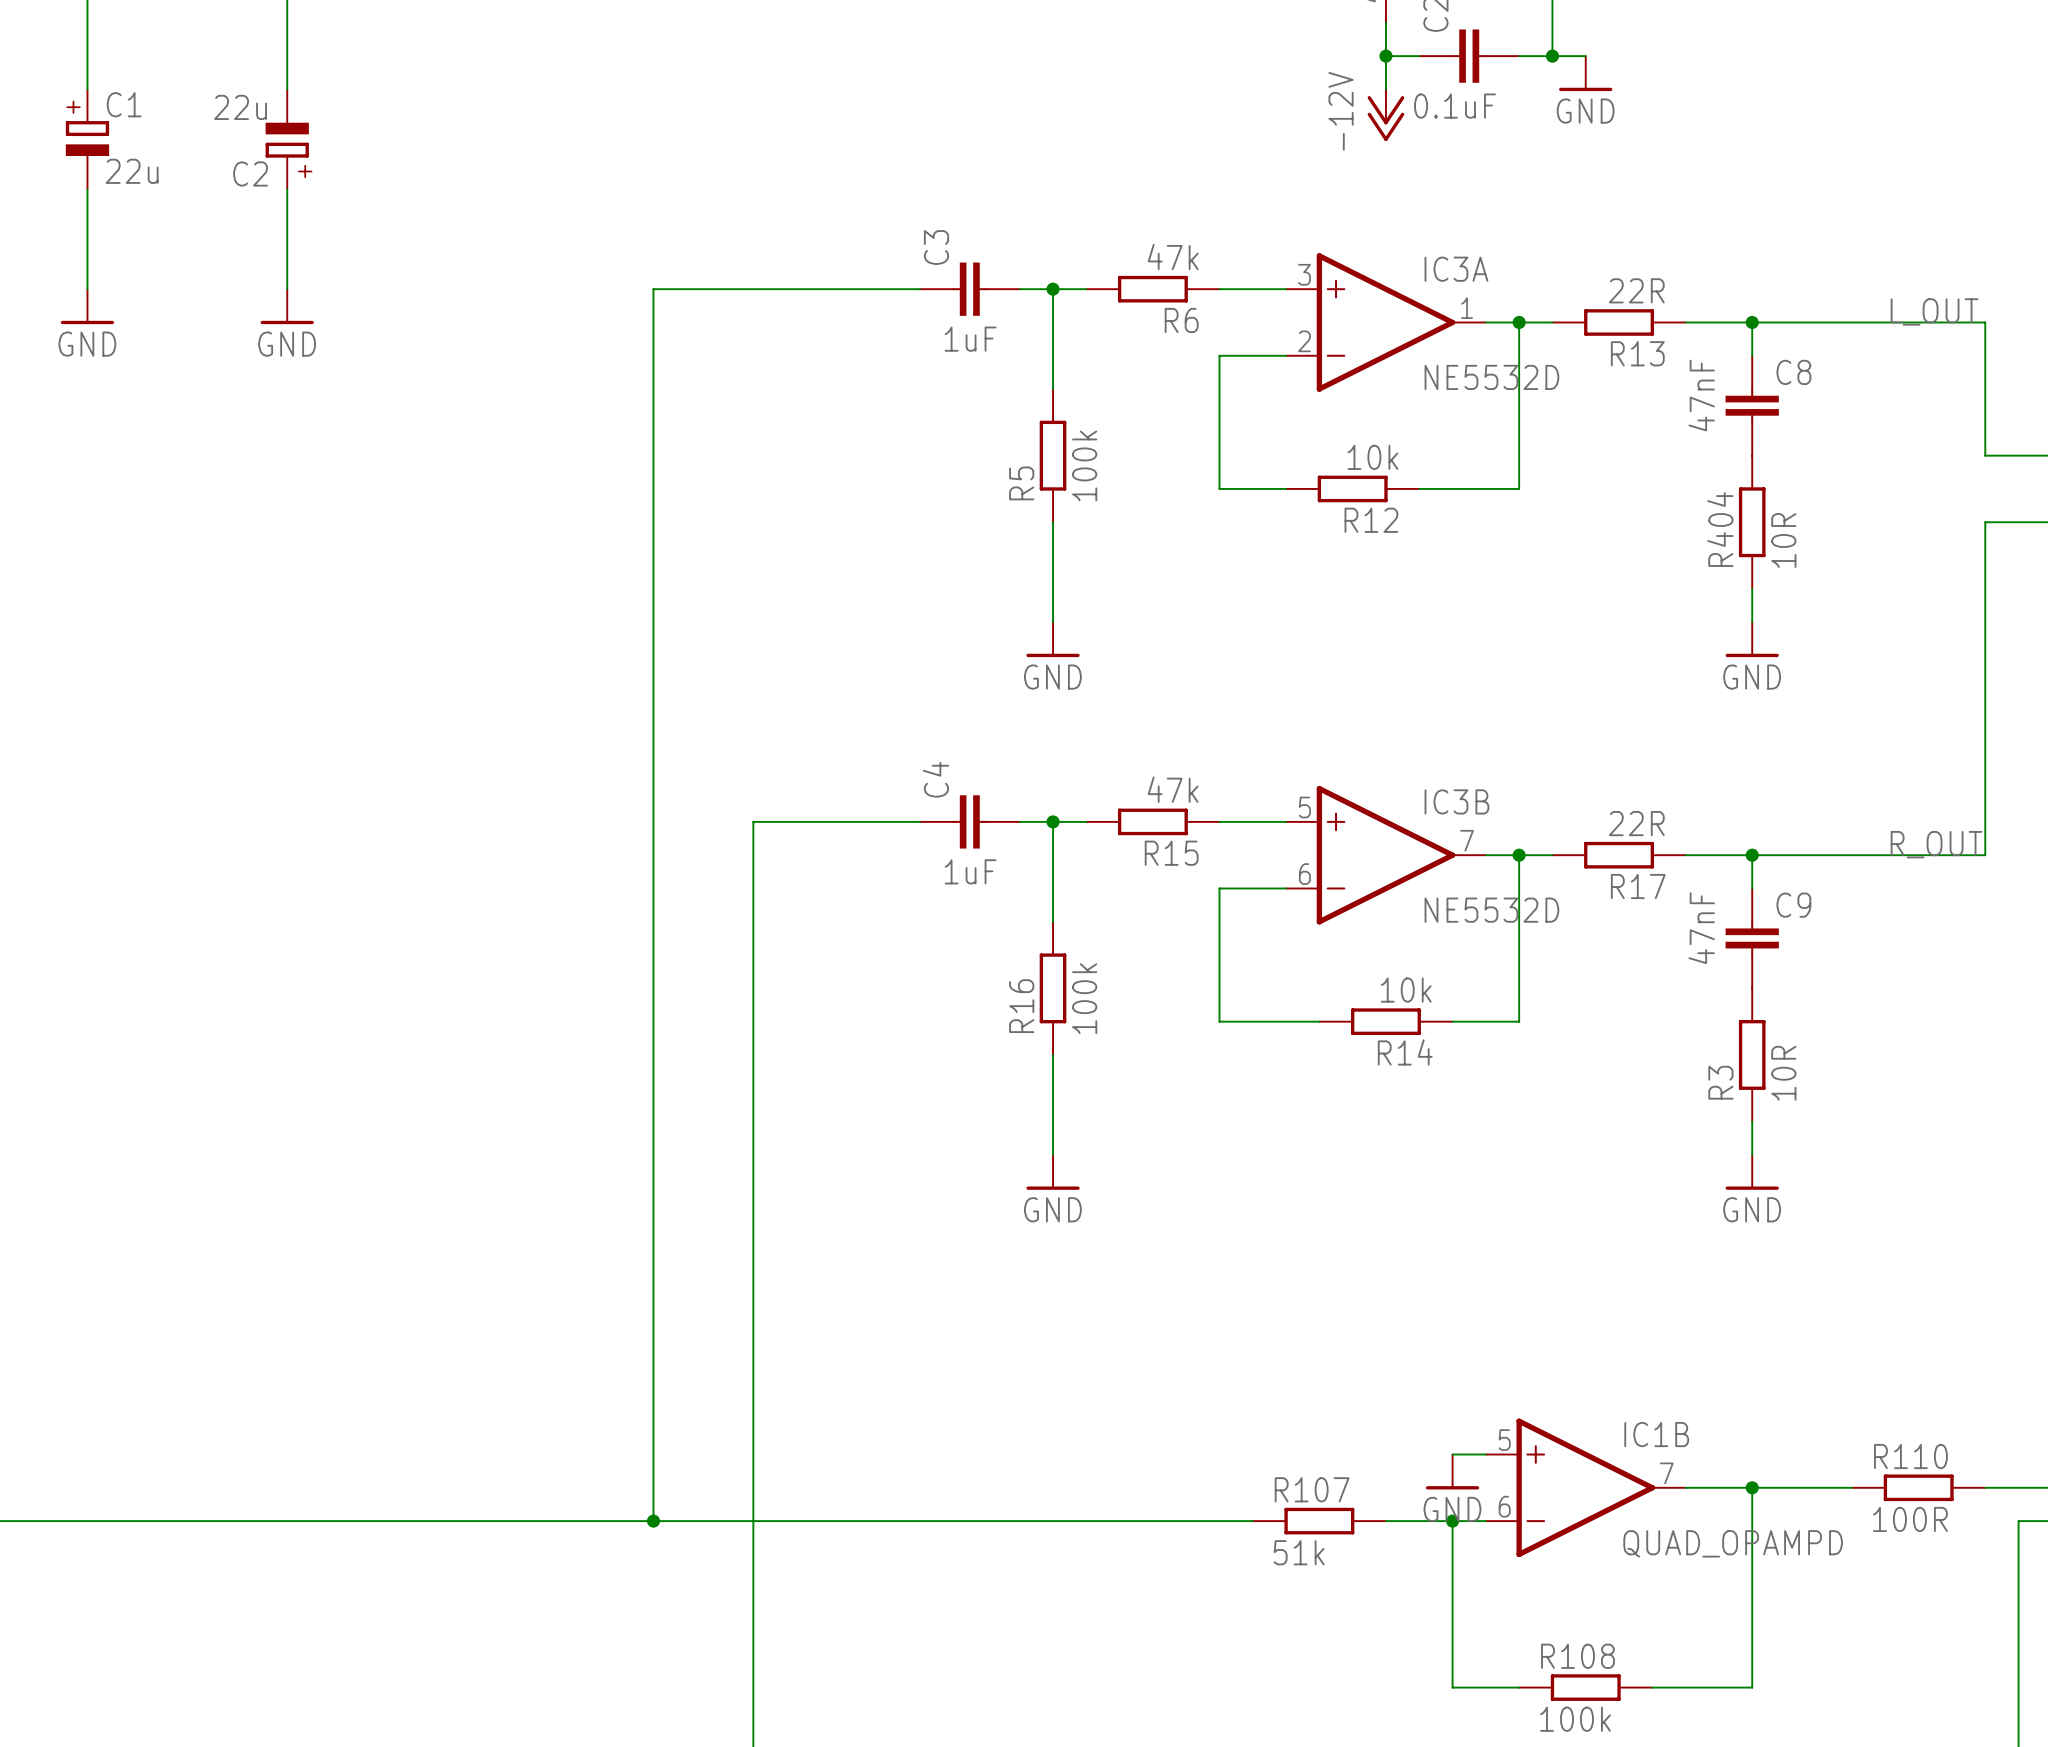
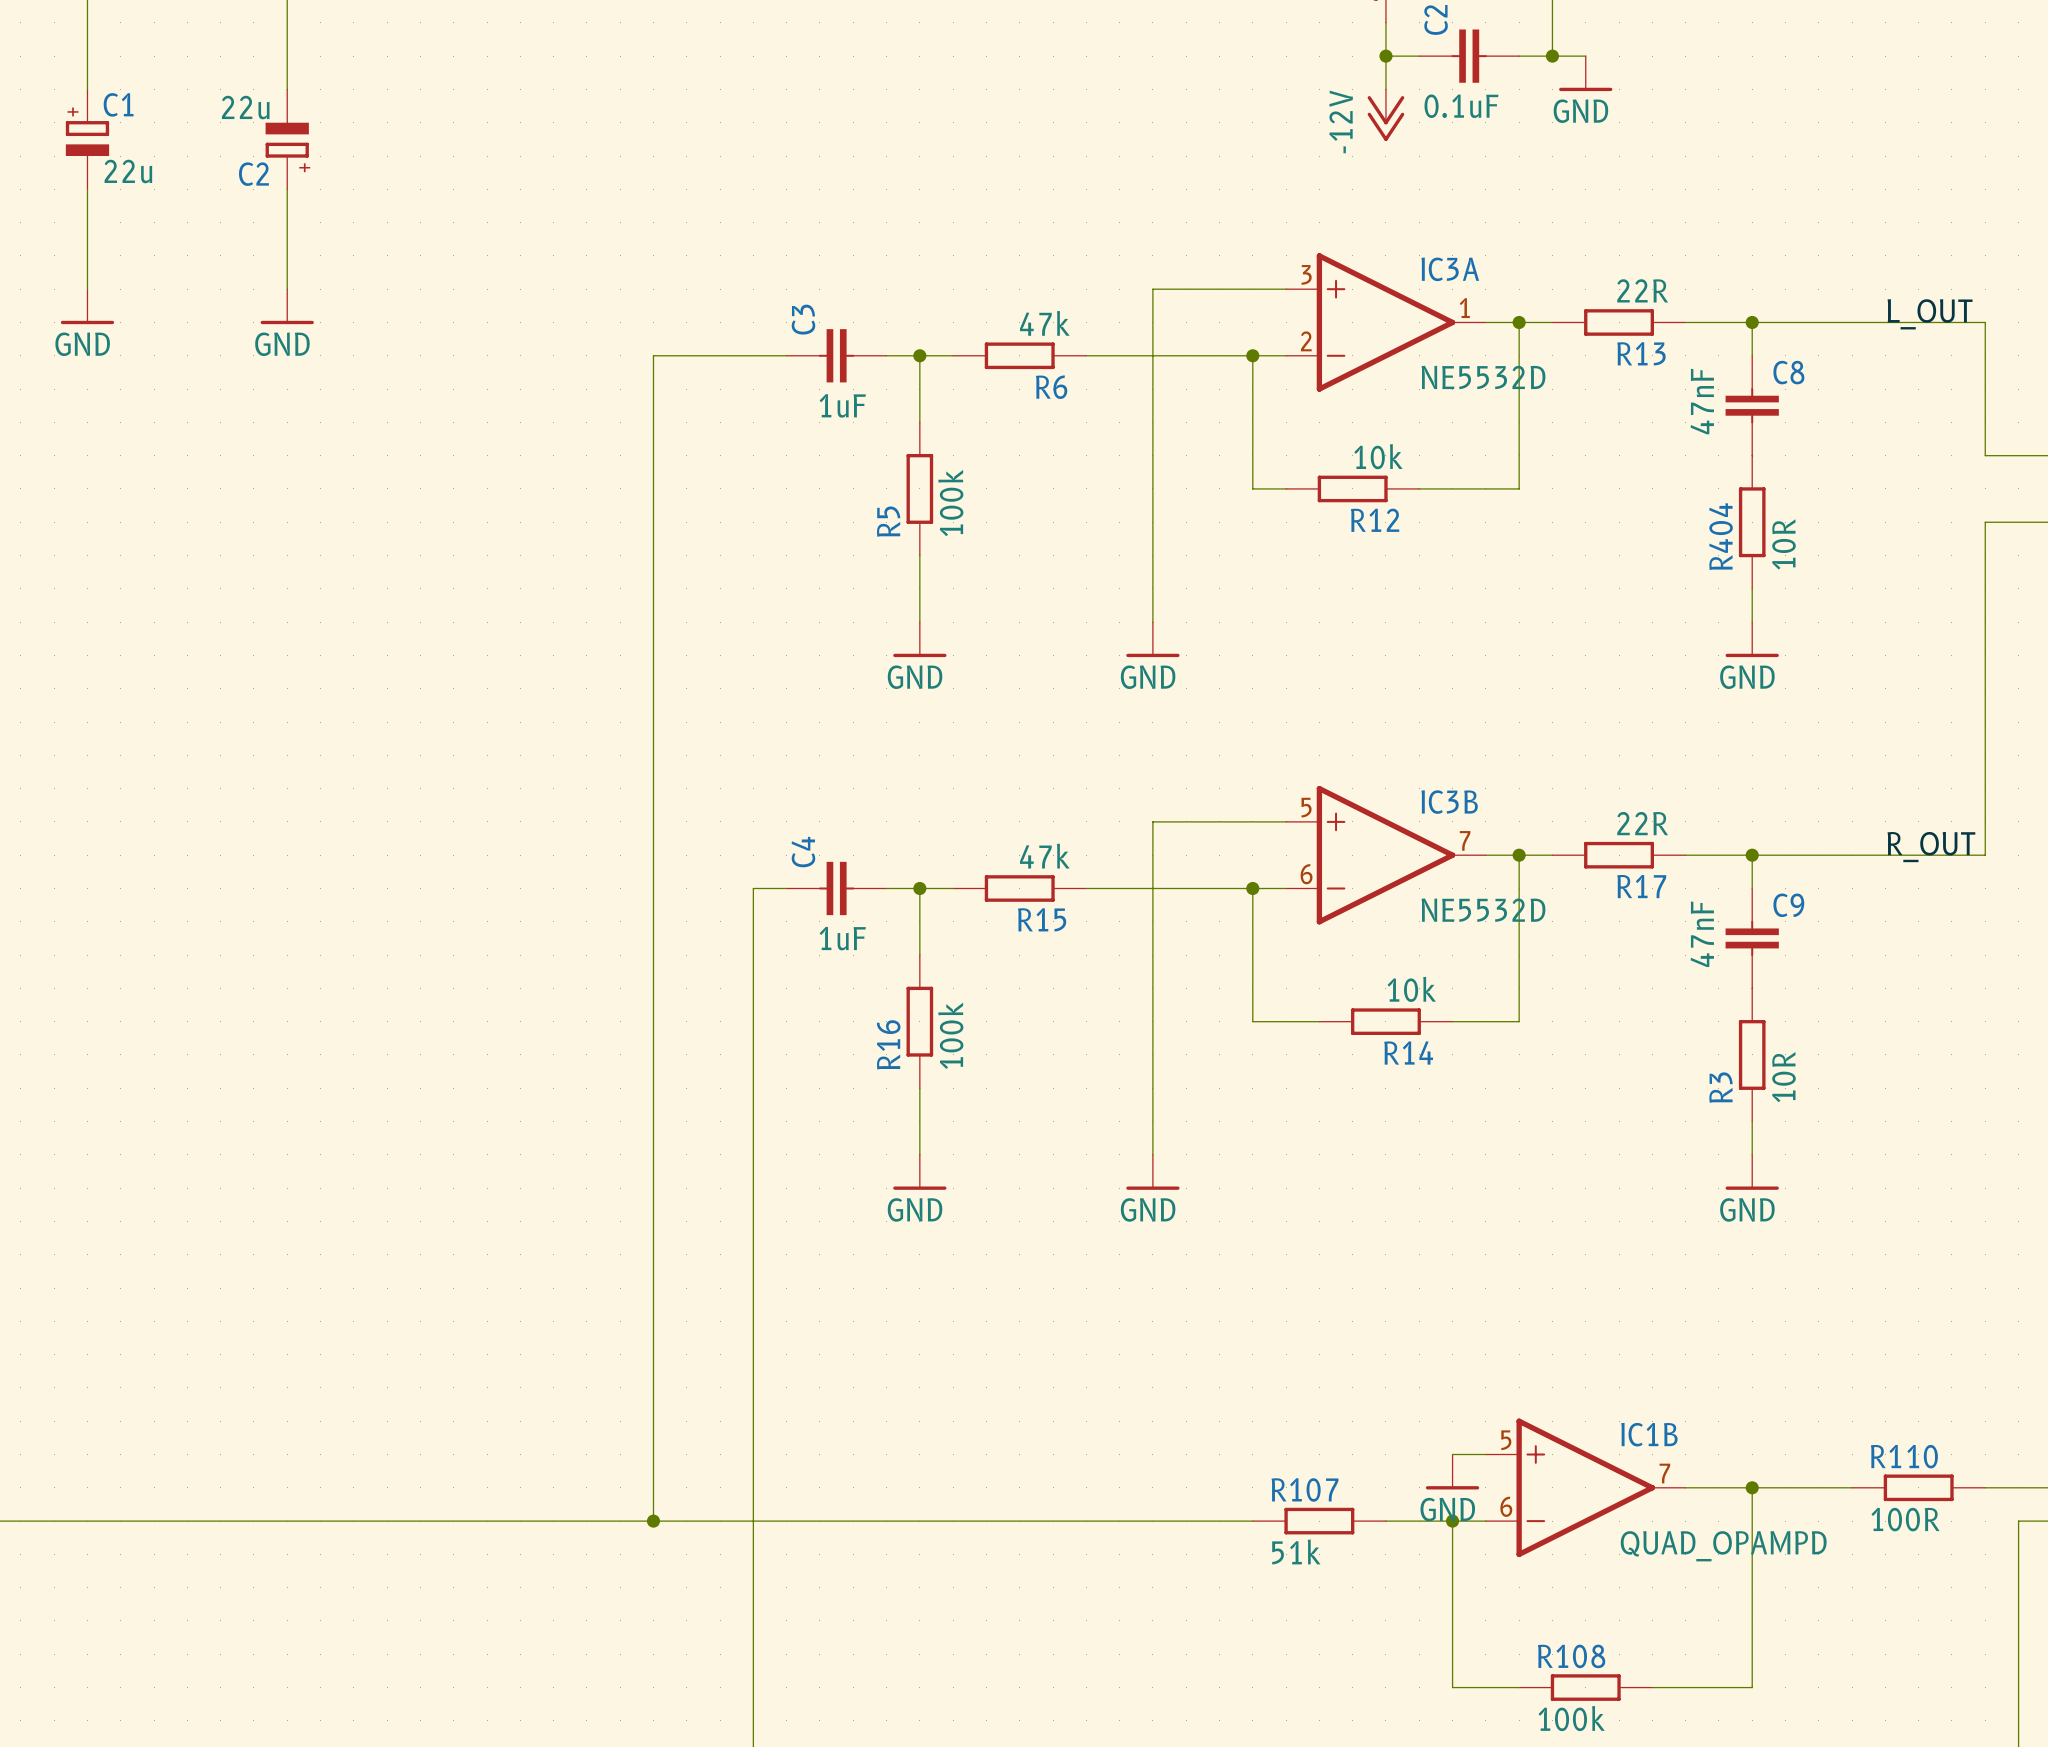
wire: (919, 289) (653, 289) (653, 355) -> (786, 355) (653, 355)
C3 position: (969, 289) -> (836, 355)
wire: (1019, 289) (1086, 289) -> (886, 355) (953, 355)
wire: (1053, 289) (1053, 389) -> none
junction: (1053, 289) -> none
R6 position: (1152, 289) -> (1019, 355)
wire: none -> (1219, 289) (1152, 289) (1152, 622)
wire: none -> (919, 355) (919, 422)
junction: none -> (919, 355)
wire: none -> (1086, 355) (1219, 355)
wire: (1219, 355) (1219, 488) (1252, 488) -> (1252, 355) (1252, 488)
junction: none -> (1252, 355)
R5 position: (1053, 455) -> (919, 488)
wire: (1053, 522) (1053, 622) -> none
wire: none -> (919, 555) (919, 622)
power symbol: none -> GND (919, 639)
power symbol: GND (1053, 639) -> none
power symbol: none -> GND (1152, 639)
wire: (919, 821) (753, 821) (753, 888) -> (786, 888) (753, 888)
C4 position: (969, 821) -> (836, 888)
wire: (1019, 821) (1086, 821) -> (886, 888) (953, 888)
wire: (1053, 821) (1053, 921) -> none
junction: (1053, 821) -> none
R15 position: (1152, 821) -> (1019, 888)
wire: none -> (1219, 821) (1152, 821) (1152, 1154)
wire: none -> (919, 888) (919, 955)
junction: none -> (919, 888)
wire: none -> (1086, 888) (1219, 888)
wire: (1219, 888) (1219, 1021) (1252, 1021) -> (1252, 888) (1252, 1021)
junction: none -> (1252, 888)
R16 position: (1053, 988) -> (919, 1021)
wire: (1053, 1054) (1053, 1154) -> none
wire: none -> (919, 1088) (919, 1154)
power symbol: none -> GND (919, 1172)
power symbol: GND (1053, 1172) -> none
power symbol: none -> GND (1152, 1172)

